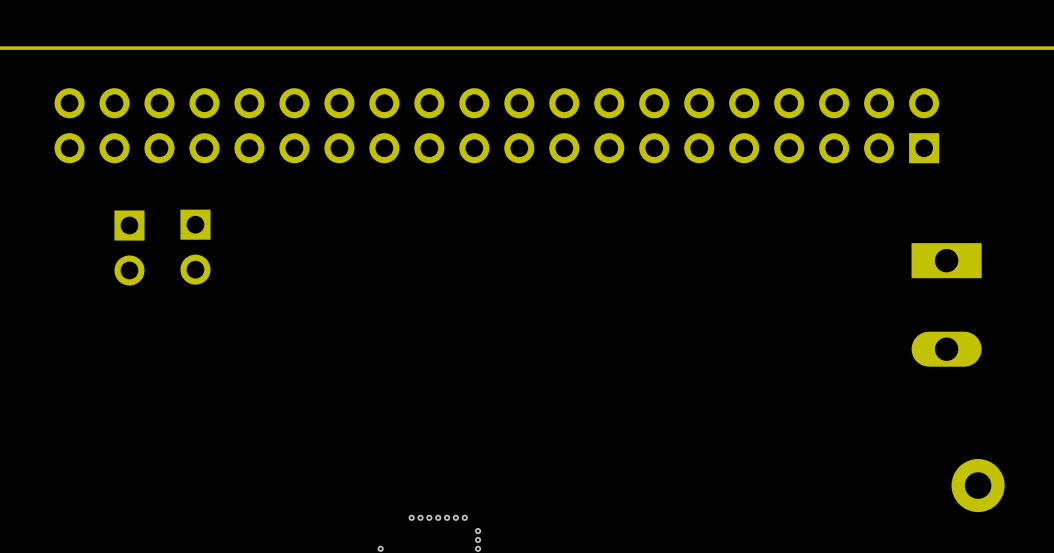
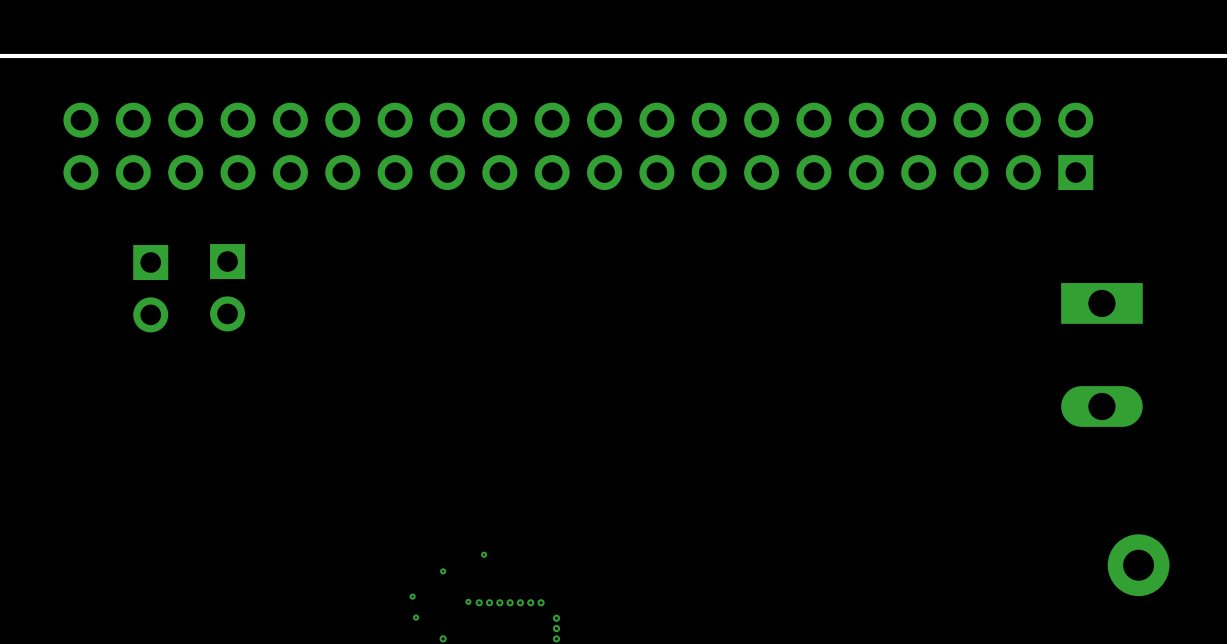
via: none -> (484, 554)
via: none -> (443, 571)
via: none -> (412, 596)
via: none -> (468, 601)
via: none -> (416, 617)

